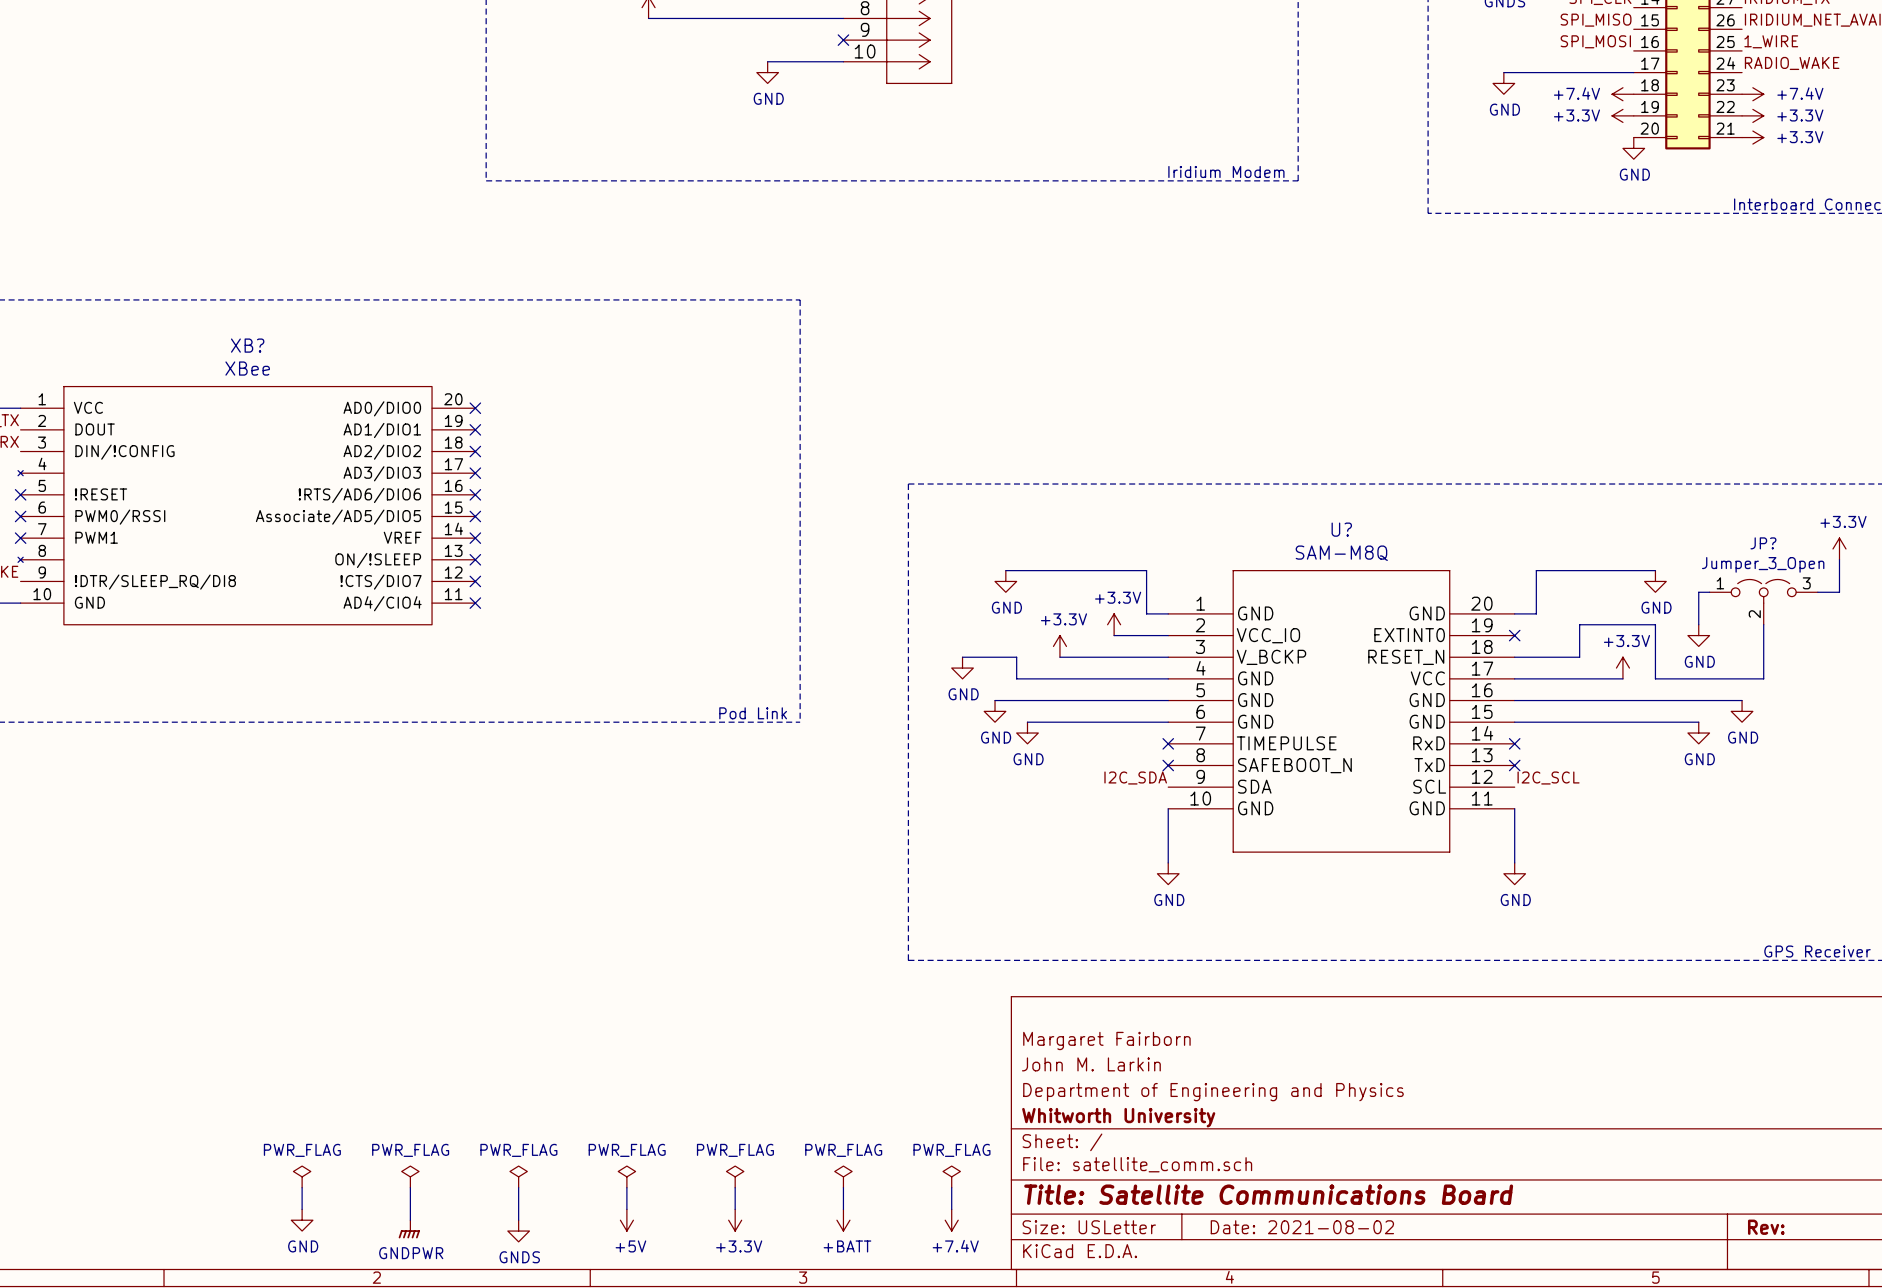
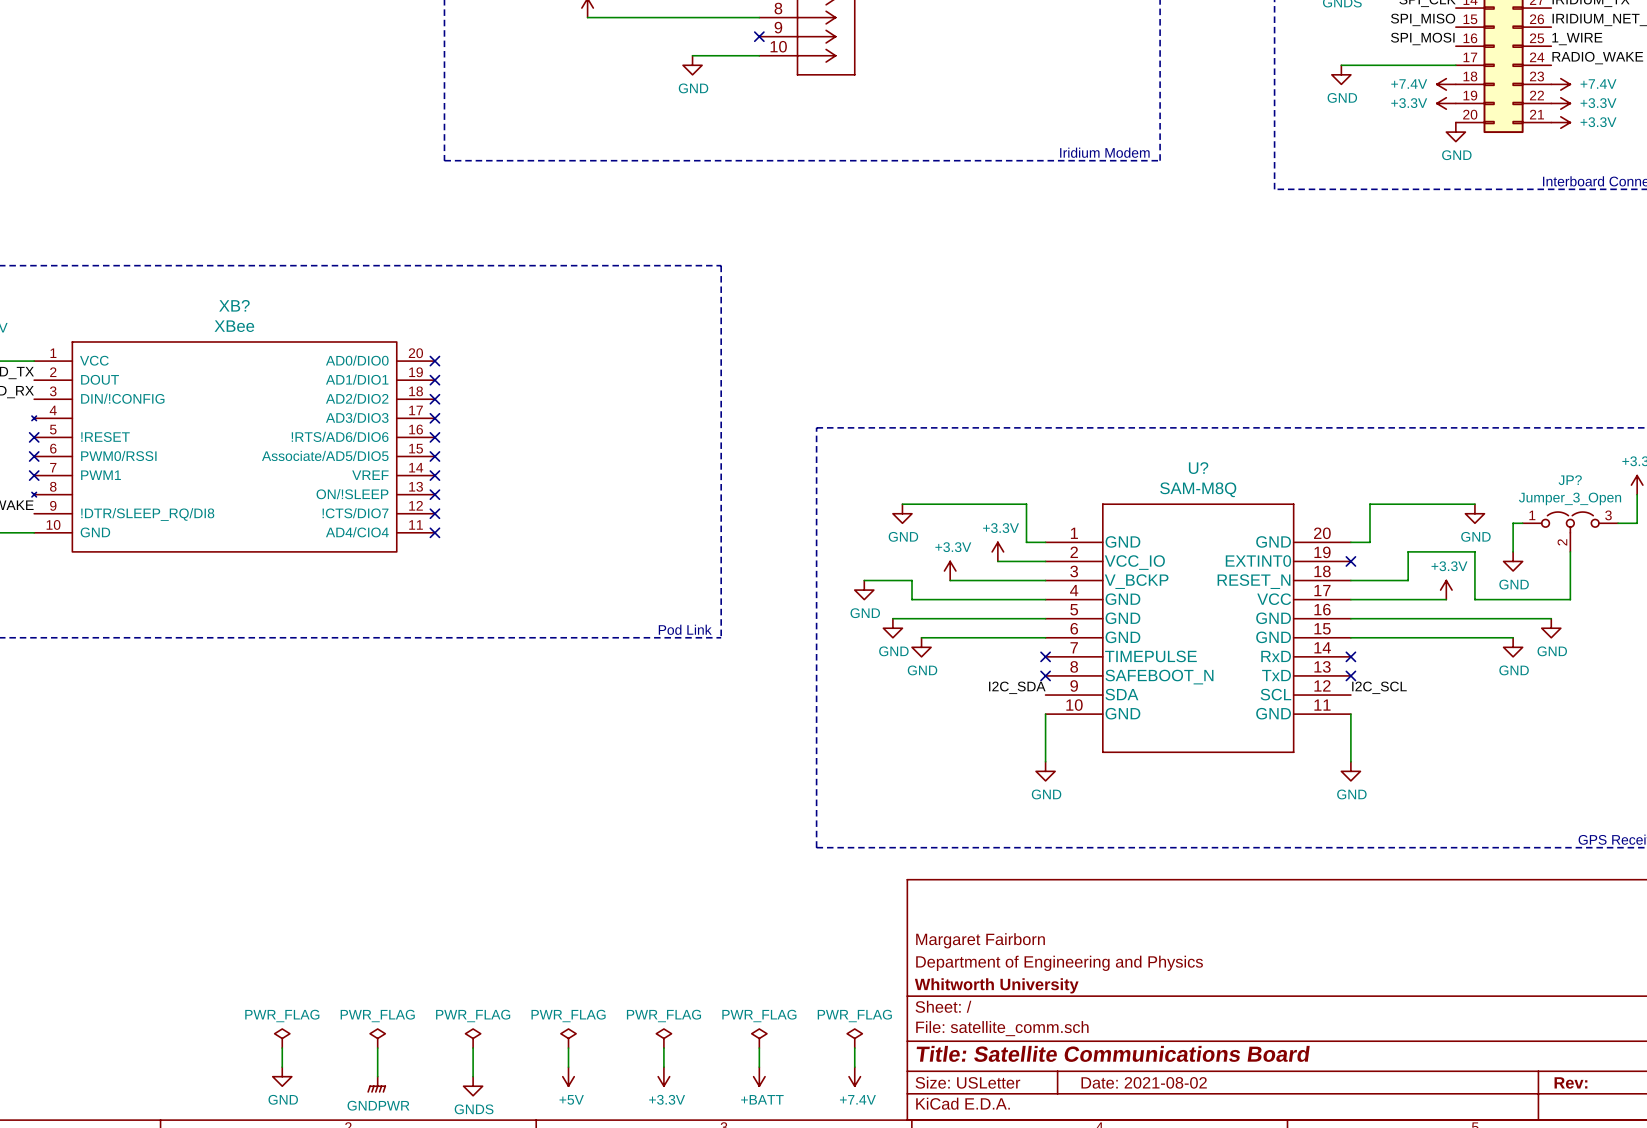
title block: Margaret Fairborn (1106, 1040) -> none
title block: John M. Larkin (1091, 1064) -> Margaret Fairborn (980, 940)

